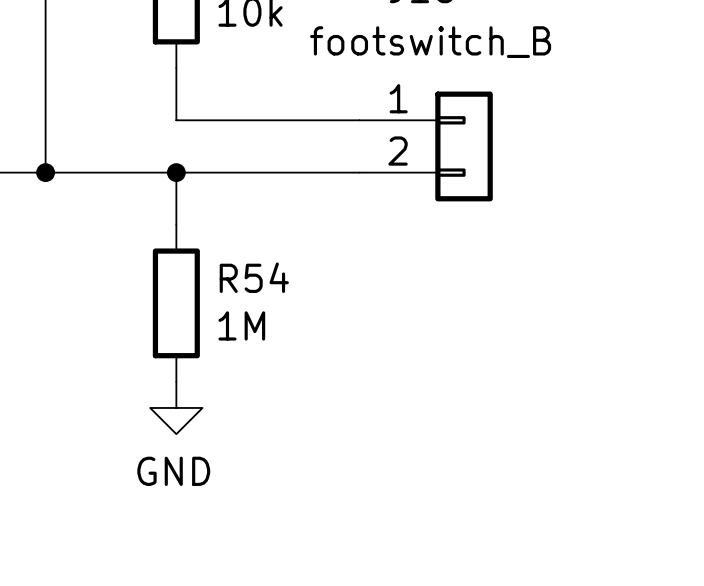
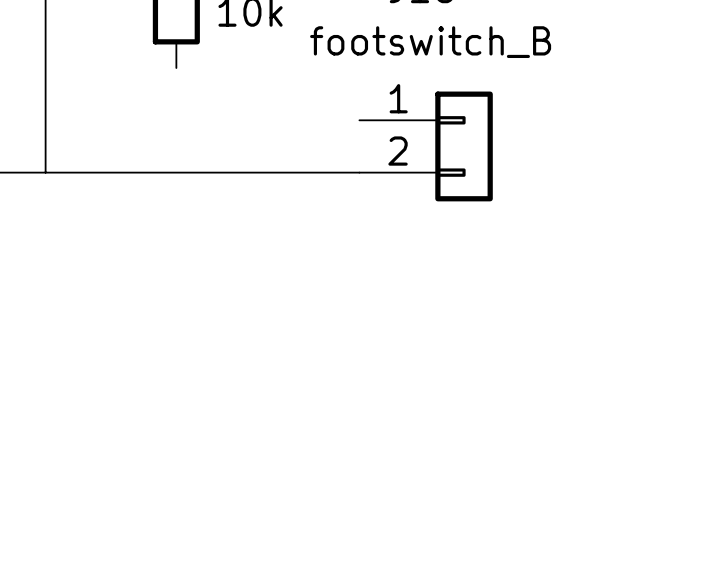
wire: (176, 68) (176, 120) (359, 120) -> none
junction: (45, 172) -> none
wire: (176, 172) (176, 224) -> none
junction: (176, 172) -> none
R54: 1M (176, 303) -> none
power symbol: GND (176, 407) -> none

